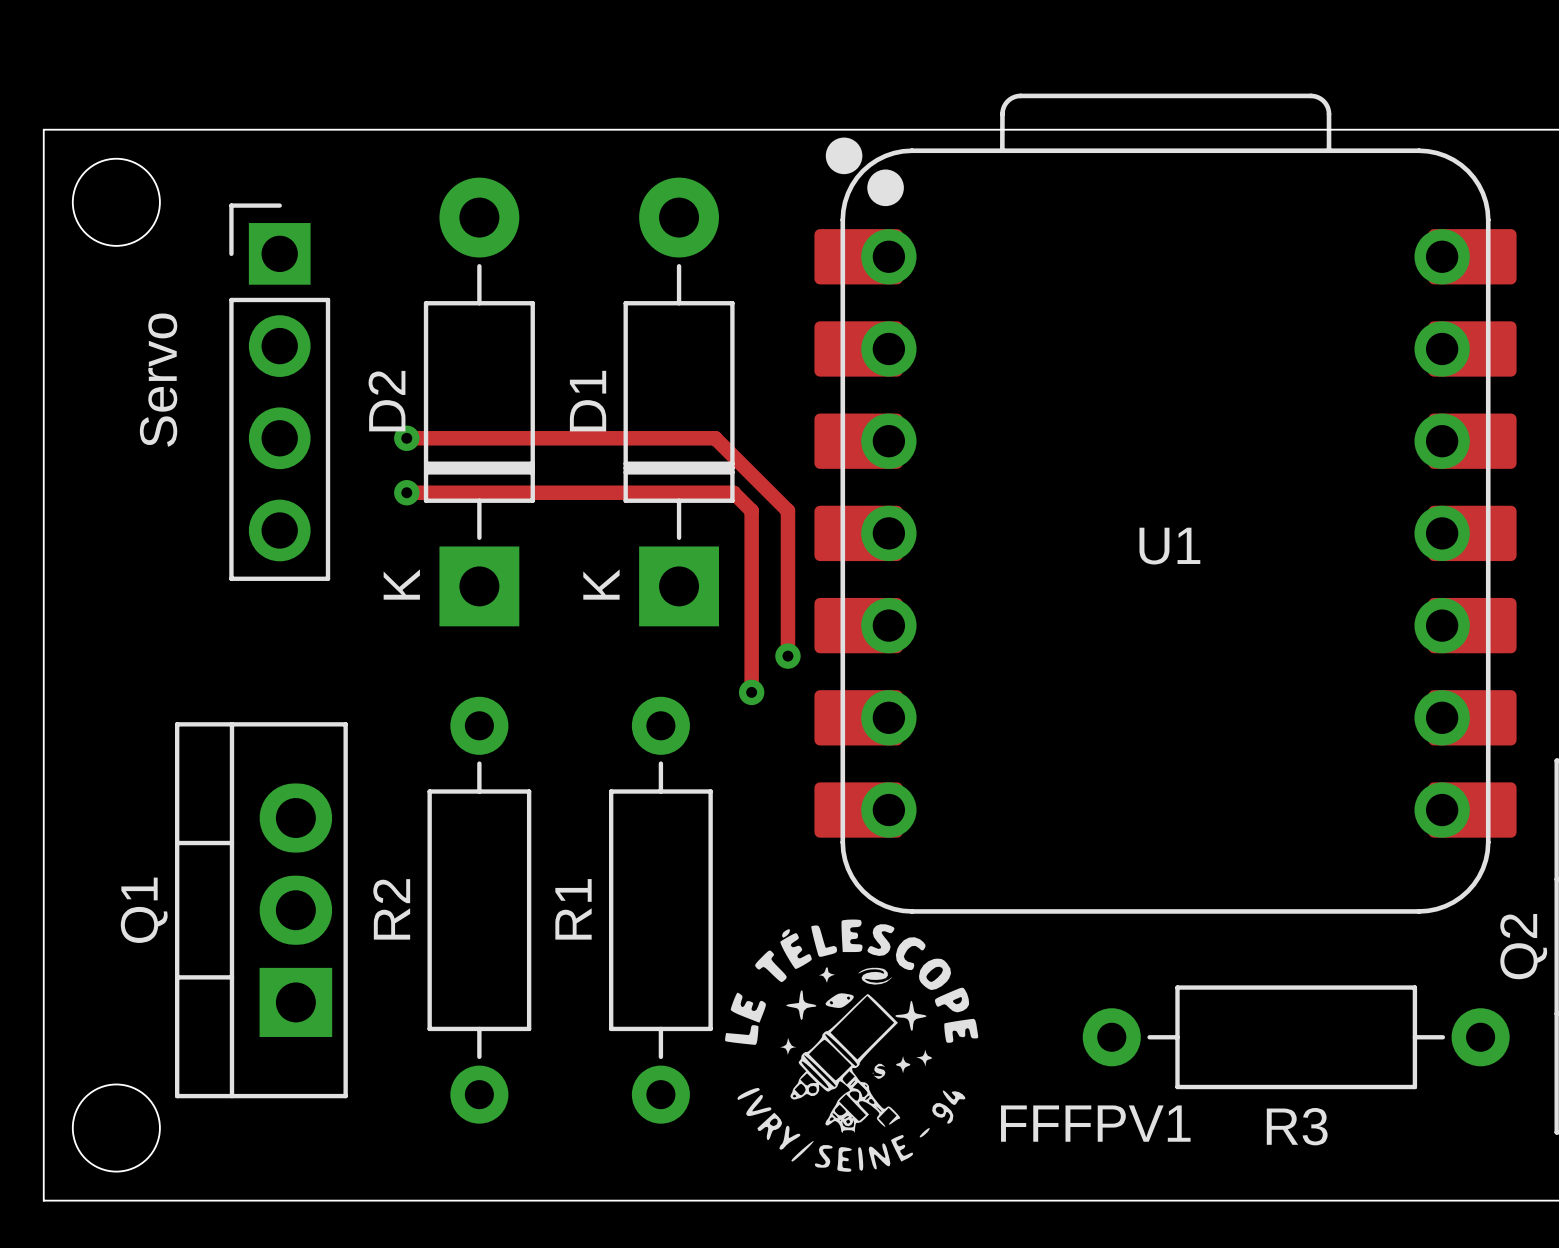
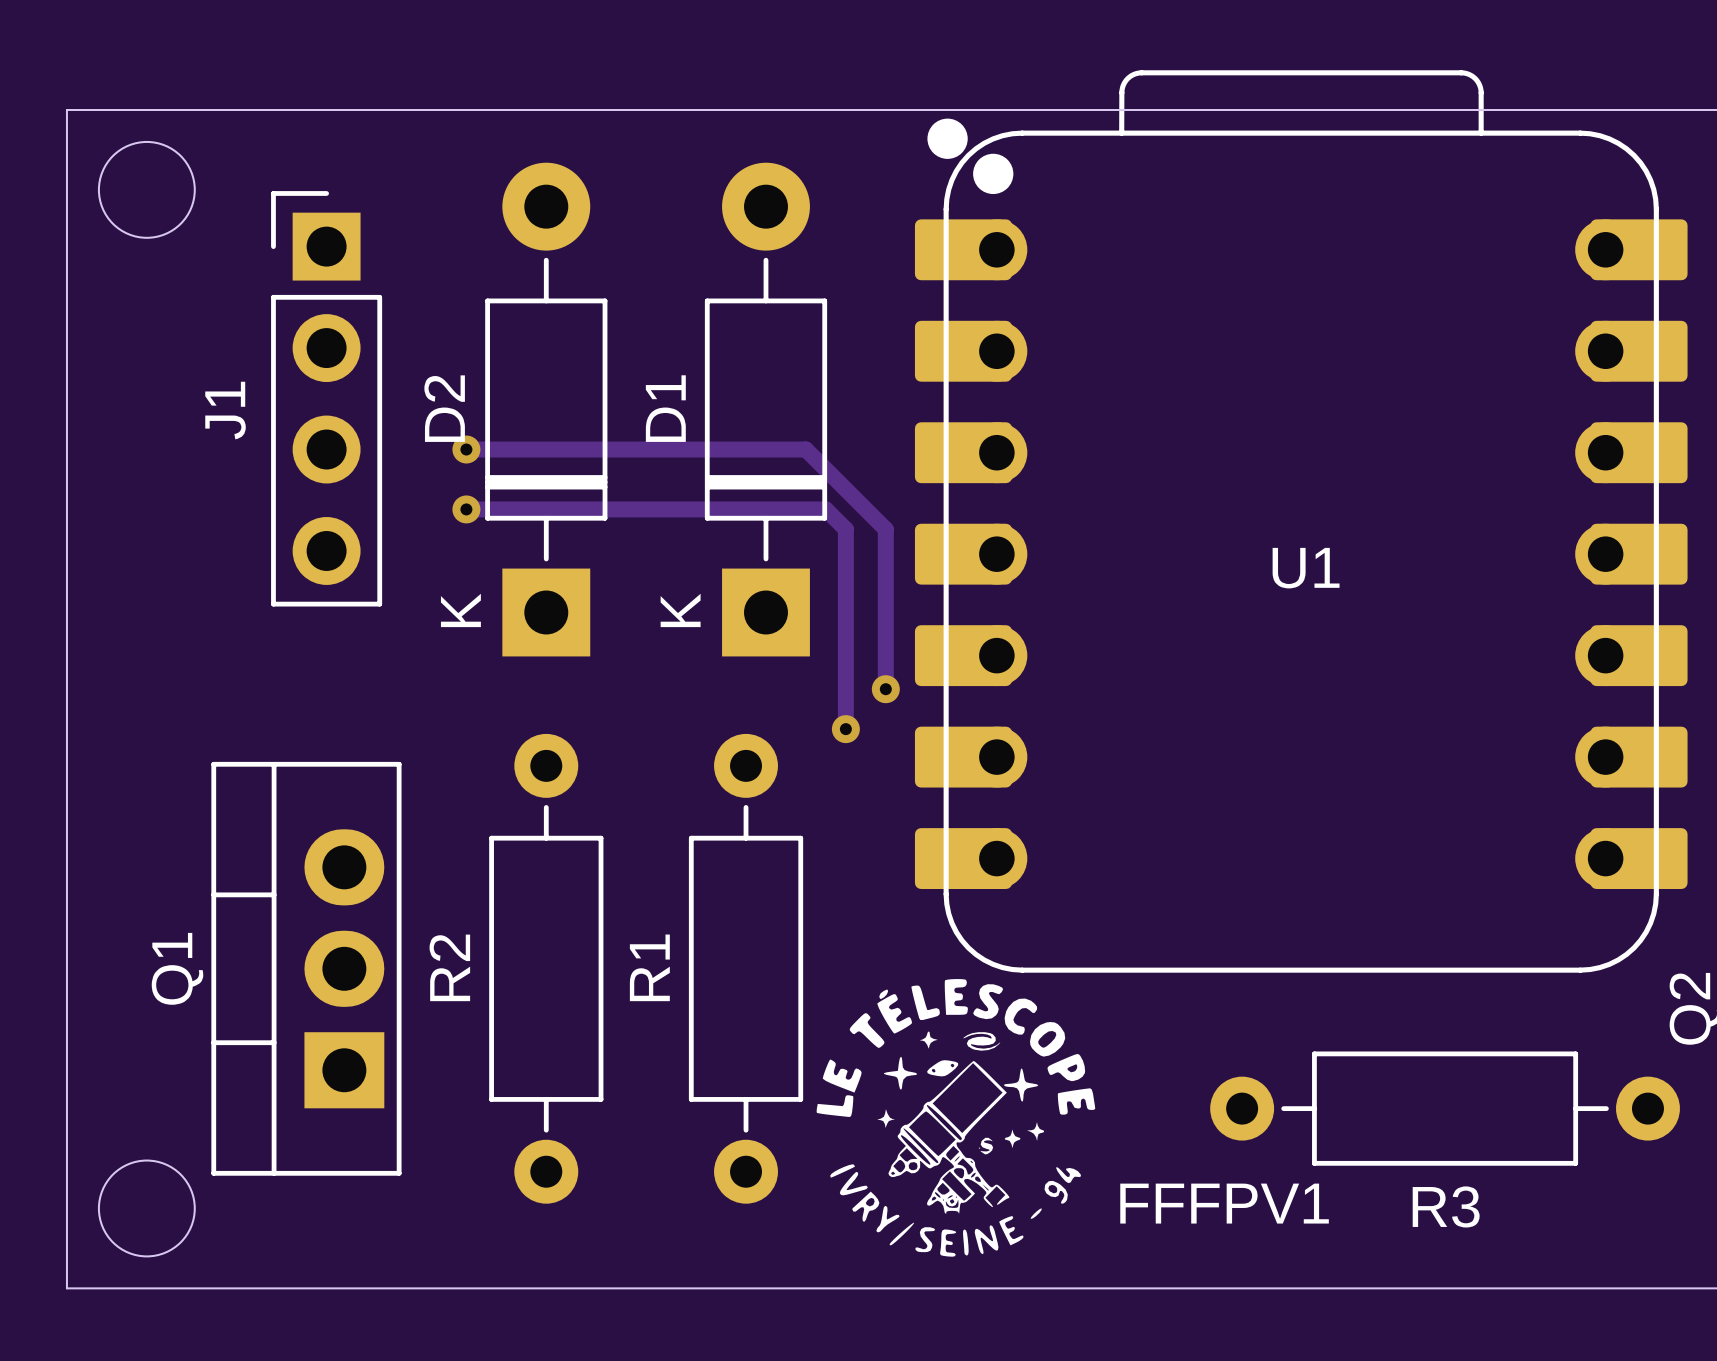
J1 value: Servo (158, 380) -> none
J1 name: none -> J1 (225, 410)

